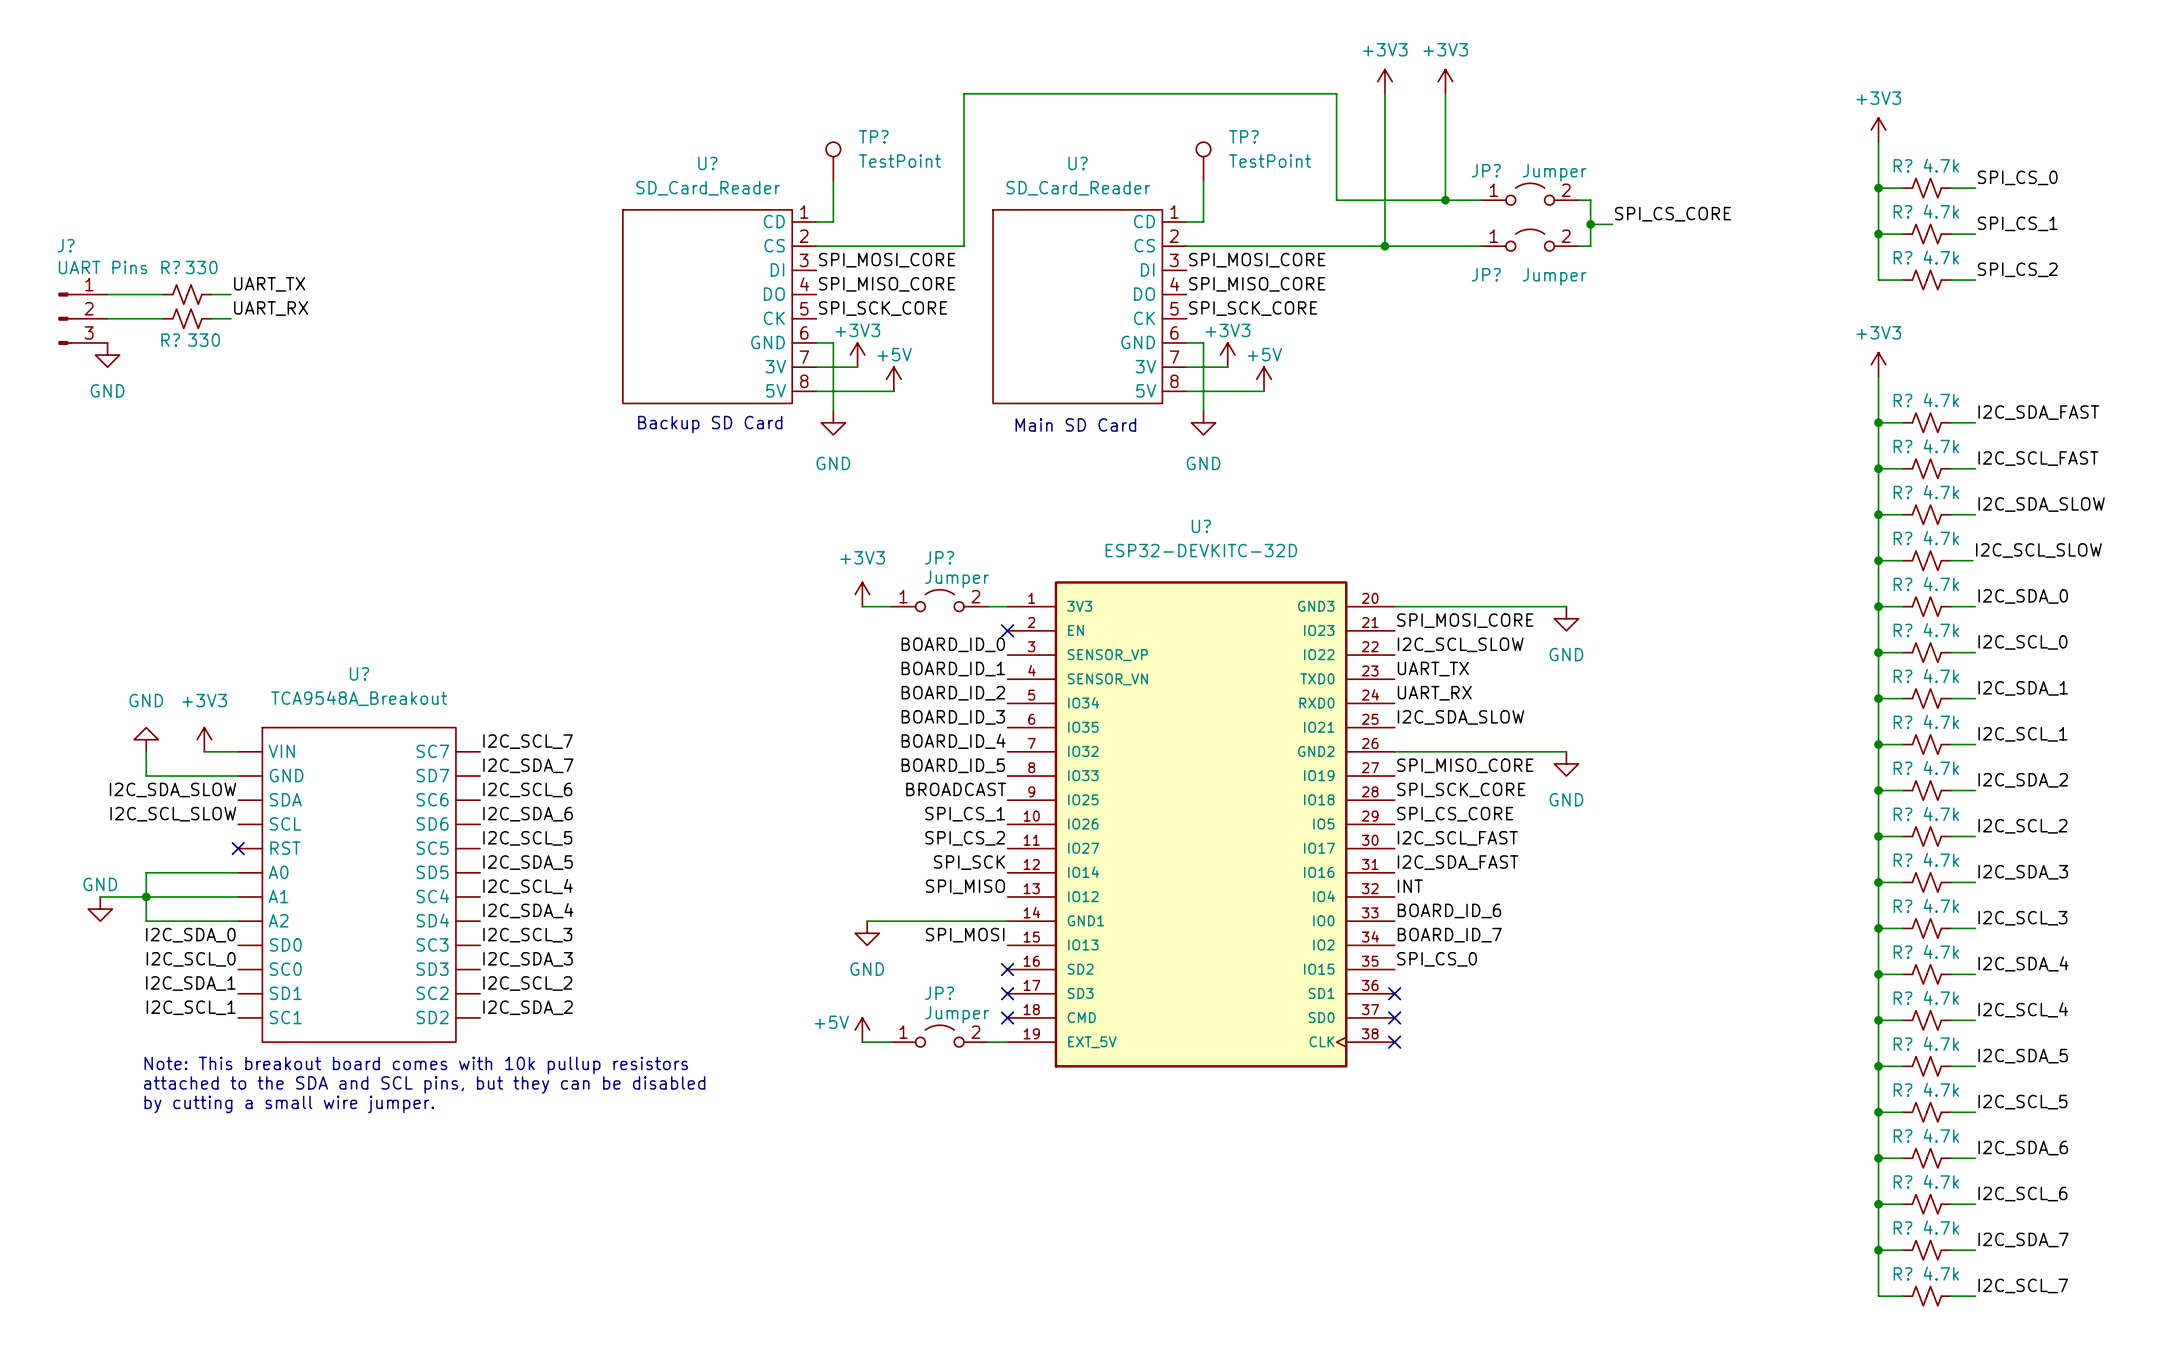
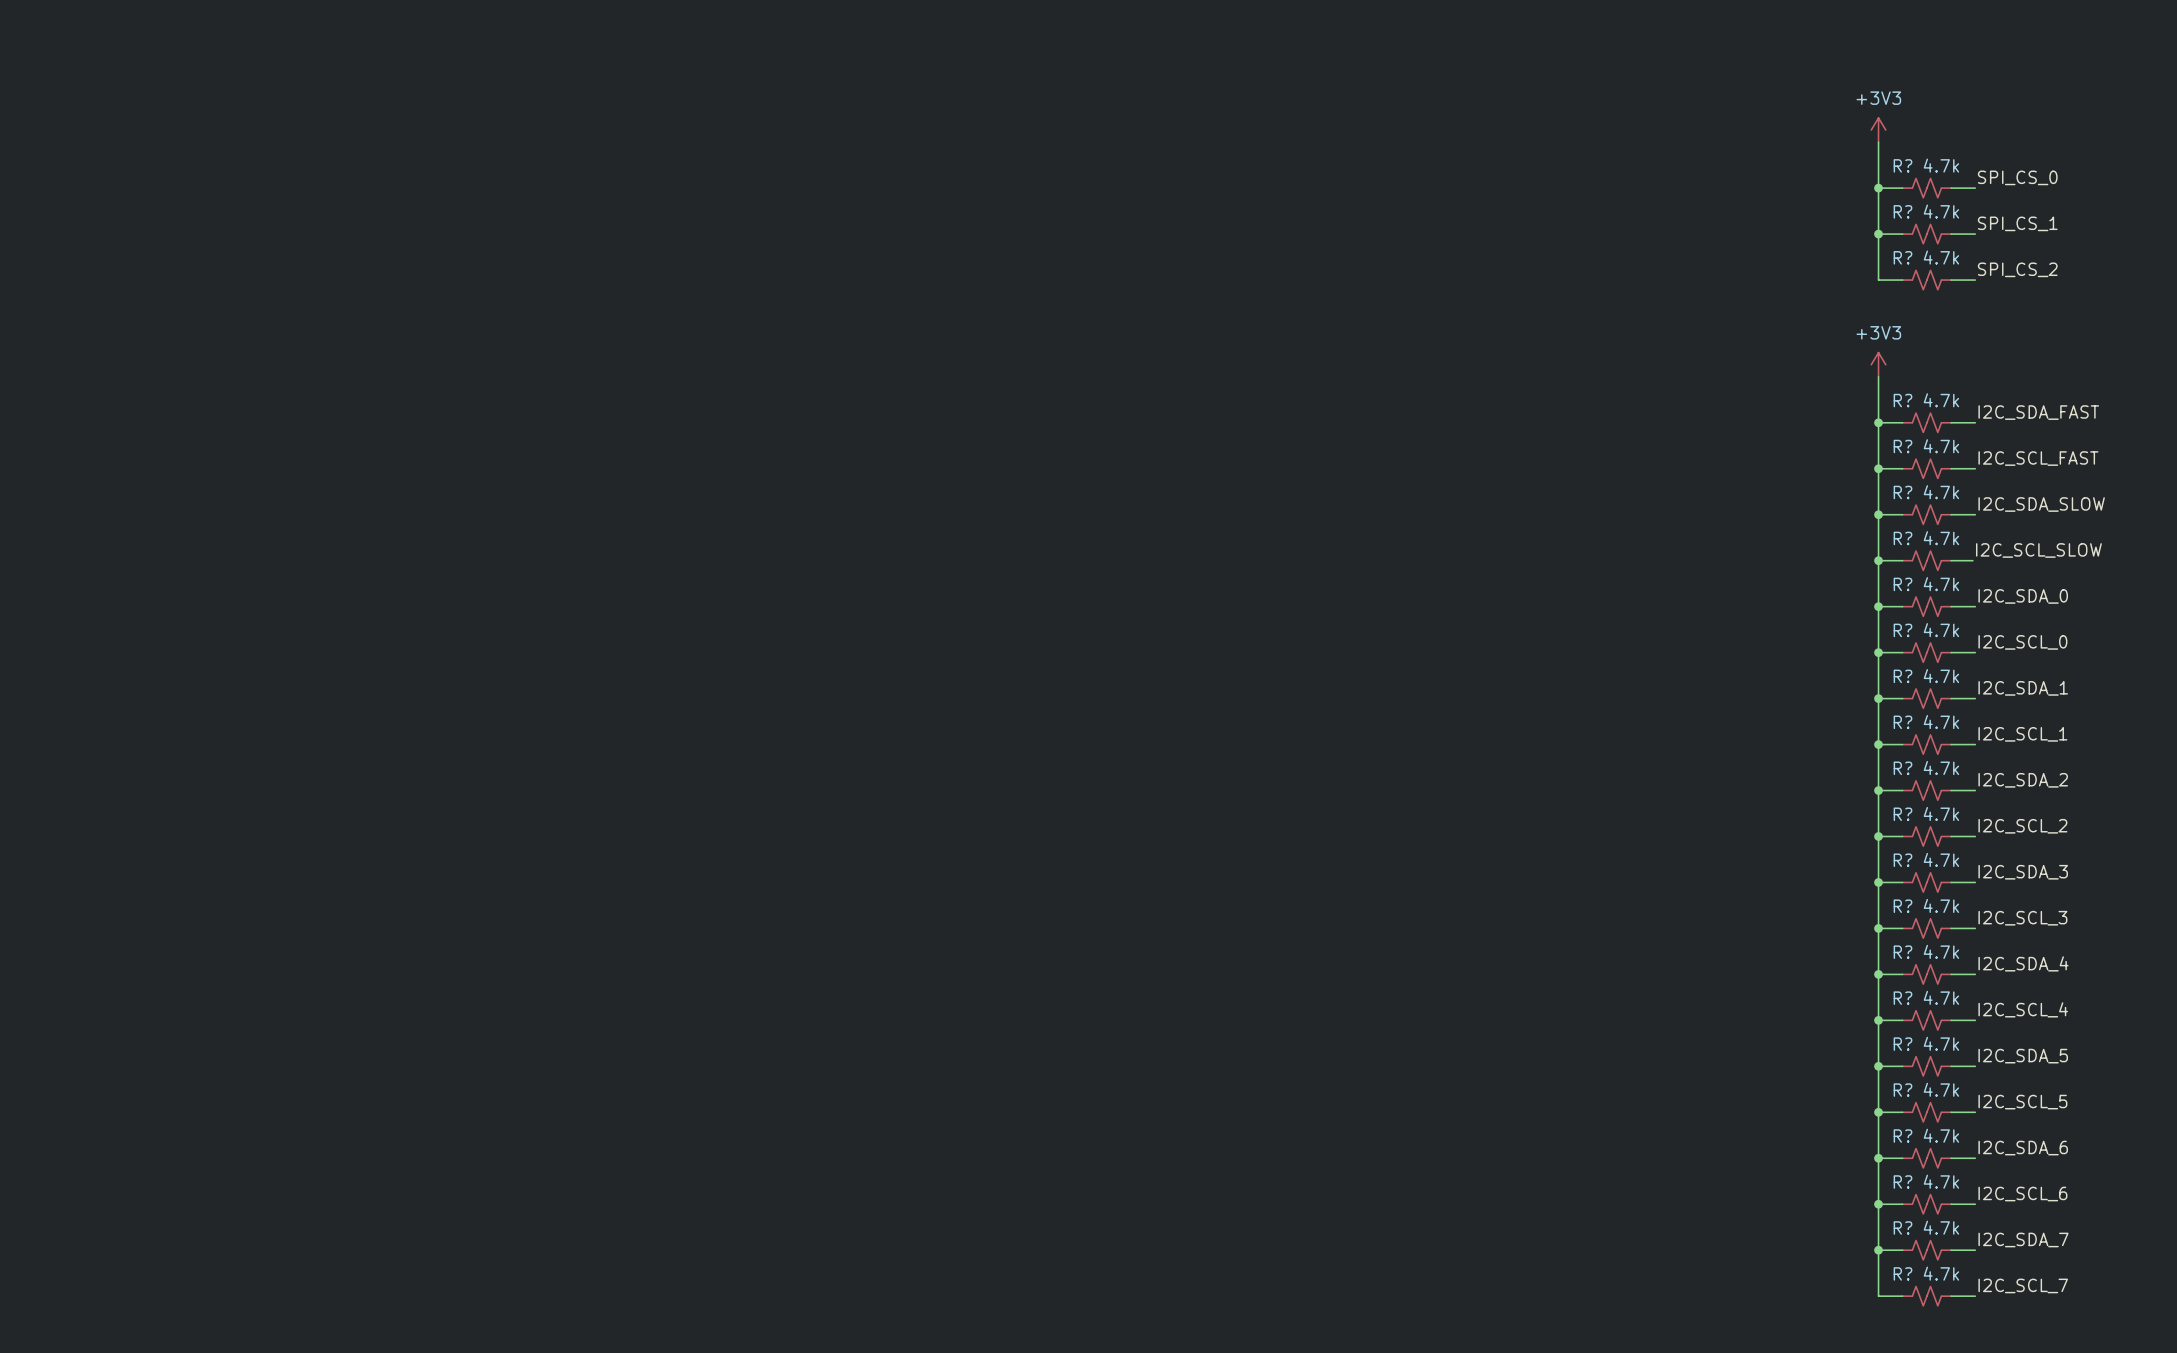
power symbol: +3V3 (1384, 81) -> none
power symbol: +3V3 (1445, 81) -> none
wire: (1384, 93) (1384, 246) -> none
wire: (1445, 93) (1445, 200) -> none
TP?: TestPoint (833, 161) -> none
TP?: TestPoint (1203, 161) -> none
wire: (833, 180) (833, 221) (816, 221) -> none
wire: (1203, 180) (1203, 221) (1186, 221) -> none
JP?: Jumper (1530, 194) -> none
junction: (1445, 200) -> none
wire: (1481, 200) (1336, 200) (1336, 93) (964, 93) (964, 246) (816, 246) -> none
wire: (1578, 200) (1590, 200) (1590, 246) (1578, 246) -> none
label: SPI_CS_CORE (1672, 214) -> none
wire: (1590, 224) (1612, 224) -> none
junction: (1590, 224) -> none
JP?: Jumper (1530, 240) -> none
wire: (1186, 246) (1481, 246) -> none
junction: (1384, 246) -> none
label: SPI_MOSI_CORE (887, 260) -> none
label: SPI_MOSI_CORE (1257, 260) -> none
label: UART_TX (269, 284) -> none
label: SPI_MISO_CORE (887, 284) -> none
label: SPI_MISO_CORE (1257, 284) -> none
wire: (107, 294) (163, 294) -> none
R?: 330 (187, 294) -> none
wire: (211, 294) (230, 294) -> none
U?: SD_Card_Reader (719, 306) -> none
U?: SD_Card_Reader (1089, 306) -> none
label: UART_RX (271, 308) -> none
label: SPI_SCK_CORE (883, 308) -> none
label: SPI_SCK_CORE (1253, 308) -> none
J?: UART Pins (83, 318) -> none
wire: (107, 318) (163, 318) -> none
R?: 330 (187, 318) -> none
wire: (211, 318) (230, 318) -> none
wire: (816, 342) (833, 342) (833, 410) -> none
wire: (1186, 342) (1203, 342) (1203, 410) -> none
power symbol: GND (107, 355) -> none
power symbol: +3V3 (857, 355) -> none
power symbol: +3V3 (1227, 355) -> none
wire: (816, 367) (857, 367) -> none
wire: (1186, 367) (1227, 367) -> none
power symbol: +5V (893, 379) -> none
power symbol: +5V (1264, 379) -> none
wire: (816, 391) (893, 391) -> none
wire: (1186, 391) (1264, 391) -> none
power symbol: GND (833, 422) -> none
power symbol: GND (1203, 422) -> none
text: Backup SD Card (710, 424) -> none
text: Main SD Card (1075, 424) -> none
power symbol: +3V3 (862, 594) -> none
JP?: Jumper (939, 600) -> none
wire: (862, 606) (891, 606) -> none
wire: (988, 606) (1007, 606) -> none
wire: (1394, 606) (1566, 606) -> none
power symbol: GND (1566, 618) -> none
label: SPI_MOSI_CORE (1465, 620) -> none
no-connect mark: (1007, 630) -> none
label: BOARD_ID_0 (953, 644) -> none
label: I2C_SCL_SLOW (1460, 644) -> none
label: BOARD_ID_1 (953, 669) -> none
label: UART_TX (1433, 669) -> none
label: BOARD_ID_2 (953, 693) -> none
label: UART_RX (1434, 693) -> none
label: BOARD_ID_3 (953, 717) -> none
label: I2C_SDA_SLOW (1460, 717) -> none
power symbol: GND (146, 739) -> none
power symbol: +3V3 (204, 739) -> none
label: I2C_SCL_7 (528, 741) -> none
label: BOARD_ID_4 (953, 741) -> none
wire: (146, 751) (146, 776) (238, 776) -> none
wire: (204, 751) (238, 751) -> none
wire: (1394, 751) (1566, 751) -> none
power symbol: GND (1566, 763) -> none
label: I2C_SDA_7 (528, 765) -> none
label: BOARD_ID_5 (953, 765) -> none
label: SPI_MISO_CORE (1465, 765) -> none
label: I2C_SDA_SLOW (173, 789) -> none
label: I2C_SCL_6 (527, 789) -> none
label: BROADCAST (956, 789) -> none
label: SPI_SCK_CORE (1461, 789) -> none
label: I2C_SCL_SLOW (173, 814) -> none
label: I2C_SDA_6 (528, 814) -> none
label: SPI_CS_1 (965, 814) -> none
label: SPI_CS_CORE (1455, 814) -> none
U?: ESP32-DEVKITC-32D (1201, 824) -> none
label: I2C_SCL_5 (527, 838) -> none
label: SPI_CS_2 (965, 838) -> none
label: I2C_SCL_FAST (1457, 838) -> none
no-connect mark: (238, 848) -> none
label: I2C_SDA_5 (528, 862) -> none
label: SPI_SCK (969, 862) -> none
label: I2C_SDA_FAST (1458, 862) -> none
wire: (238, 872) (146, 872) (146, 921) (238, 921) -> none
U?: TCA9548A_Breakout (359, 884) -> none
label: I2C_SCL_4 (528, 886) -> none
label: SPI_MISO (965, 886) -> none
label: INT (1410, 886) -> none
wire: (100, 896) (238, 896) -> none
junction: (146, 896) -> none
power symbol: GND (100, 909) -> none
label: I2C_SDA_4 (528, 910) -> none
label: BOARD_ID_6 (1449, 910) -> none
wire: (867, 921) (1007, 921) -> none
power symbol: GND (867, 933) -> none
label: I2C_SDA_0 (190, 935) -> none
label: I2C_SCL_3 (527, 935) -> none
label: SPI_MOSI (965, 935) -> none
label: BOARD_ID_7 (1449, 935) -> none
label: I2C_SCL_0 (191, 959) -> none
label: I2C_SDA_3 (528, 959) -> none
label: SPI_CS_0 (1437, 959) -> none
no-connect mark: (1007, 969) -> none
label: I2C_SDA_1 (190, 983) -> none
label: I2C_SCL_2 (527, 983) -> none
no-connect mark: (1007, 993) -> none
no-connect mark: (1394, 993) -> none
label: I2C_SCL_1 (191, 1007) -> none
label: I2C_SDA_2 (528, 1007) -> none
no-connect mark: (1007, 1017) -> none
no-connect mark: (1394, 1017) -> none
power symbol: +5V (862, 1030) -> none
JP?: Jumper (939, 1036) -> none
wire: (862, 1042) (891, 1042) -> none
wire: (988, 1042) (1007, 1042) -> none
no-connect mark: (1394, 1042) -> none
text: Note: This breakout board comes with 10k pullup resistors (416, 1065) -> none
text: attached to the SDA and SCL pins, but they can be disabled (424, 1084) -> none
text: by cutting a small wire jumper. (289, 1104) -> none

